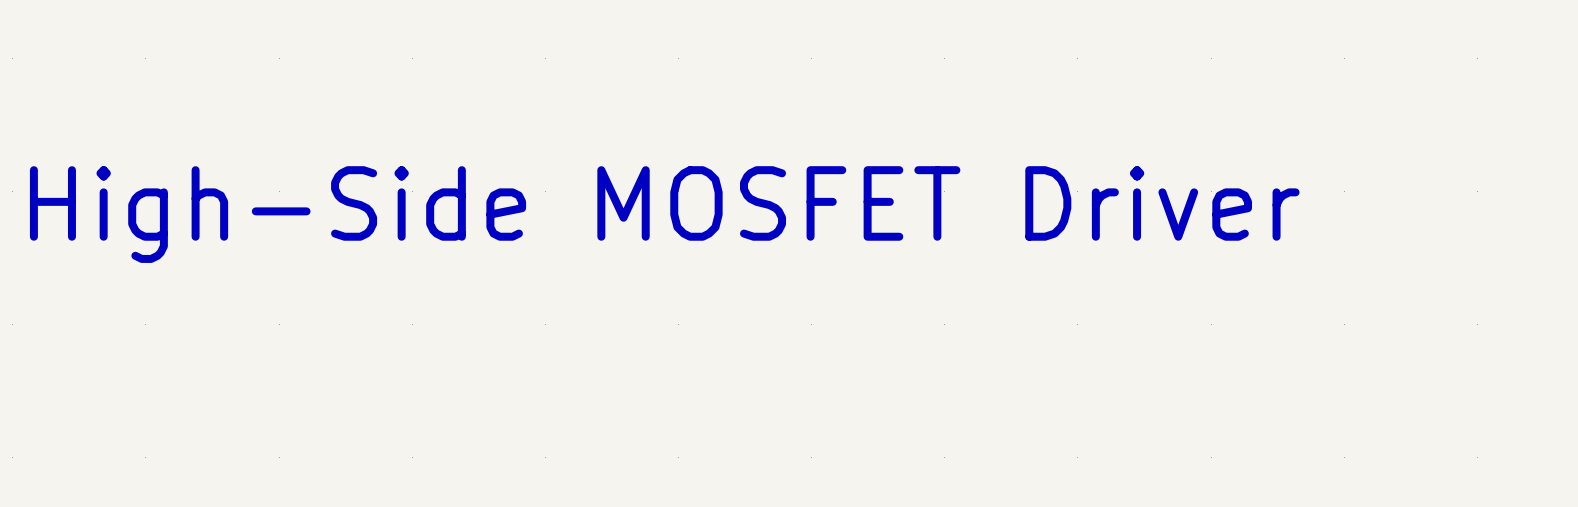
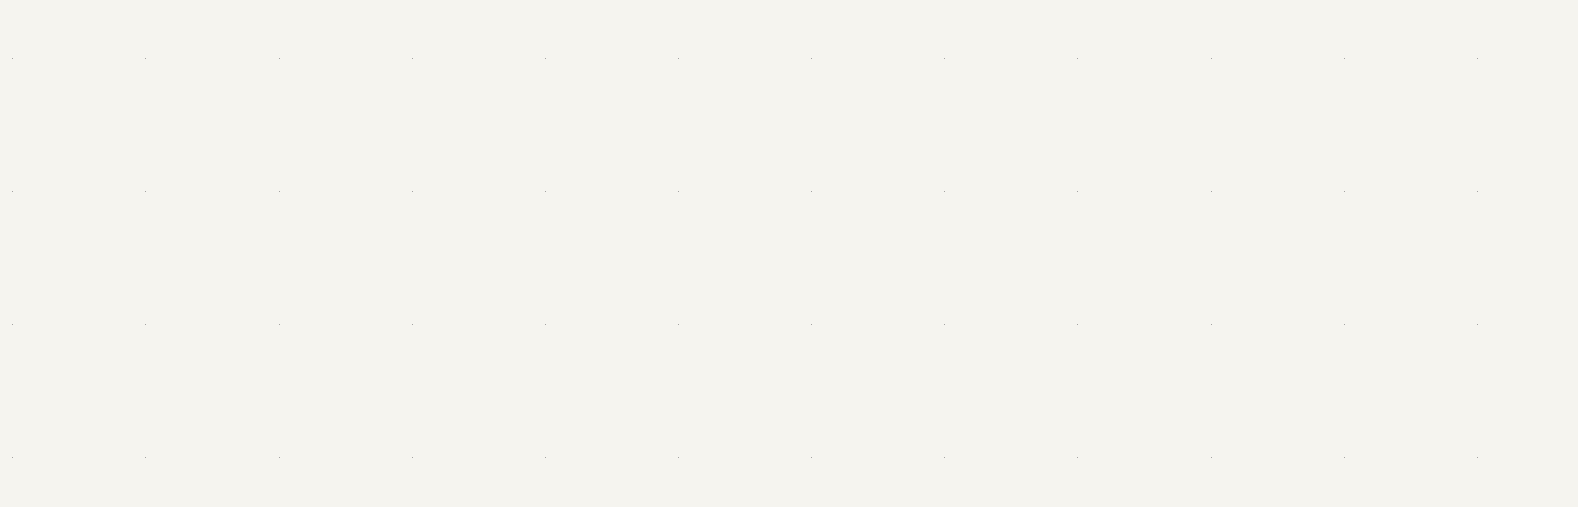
text: High-Side MOSFET Driver (664, 214) -> none

